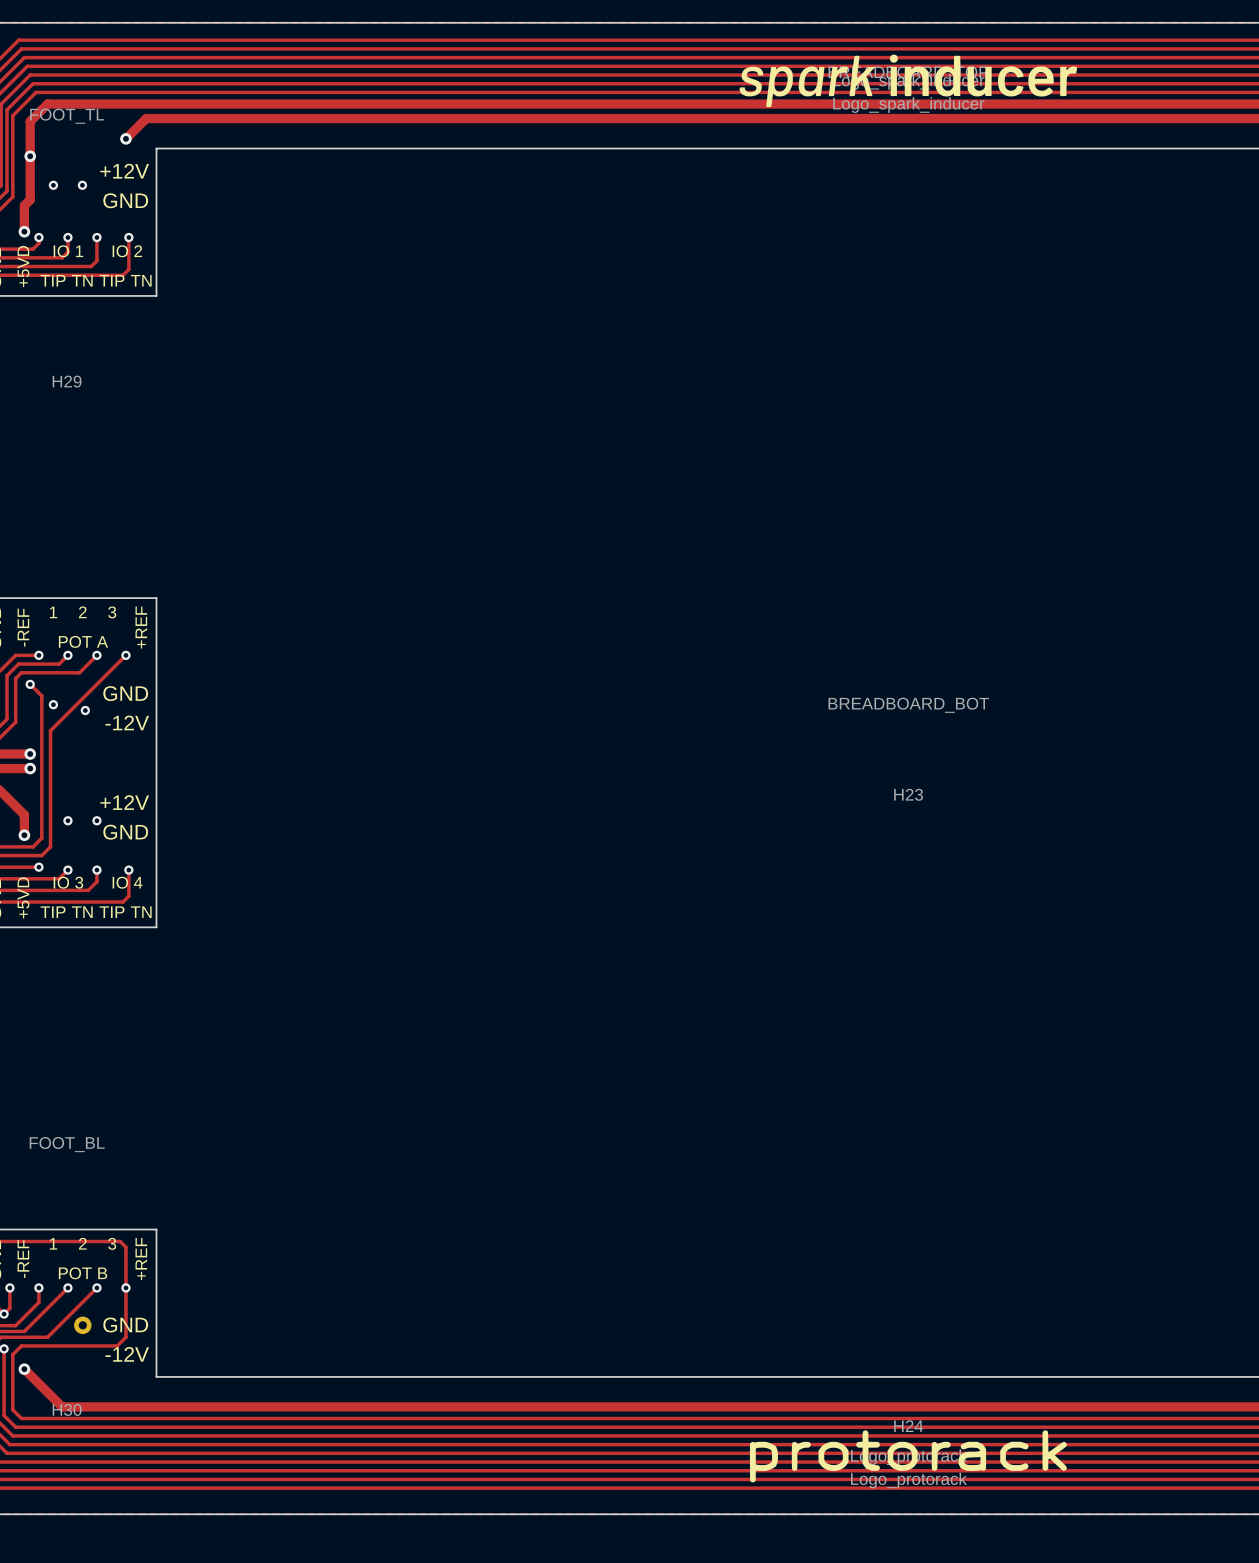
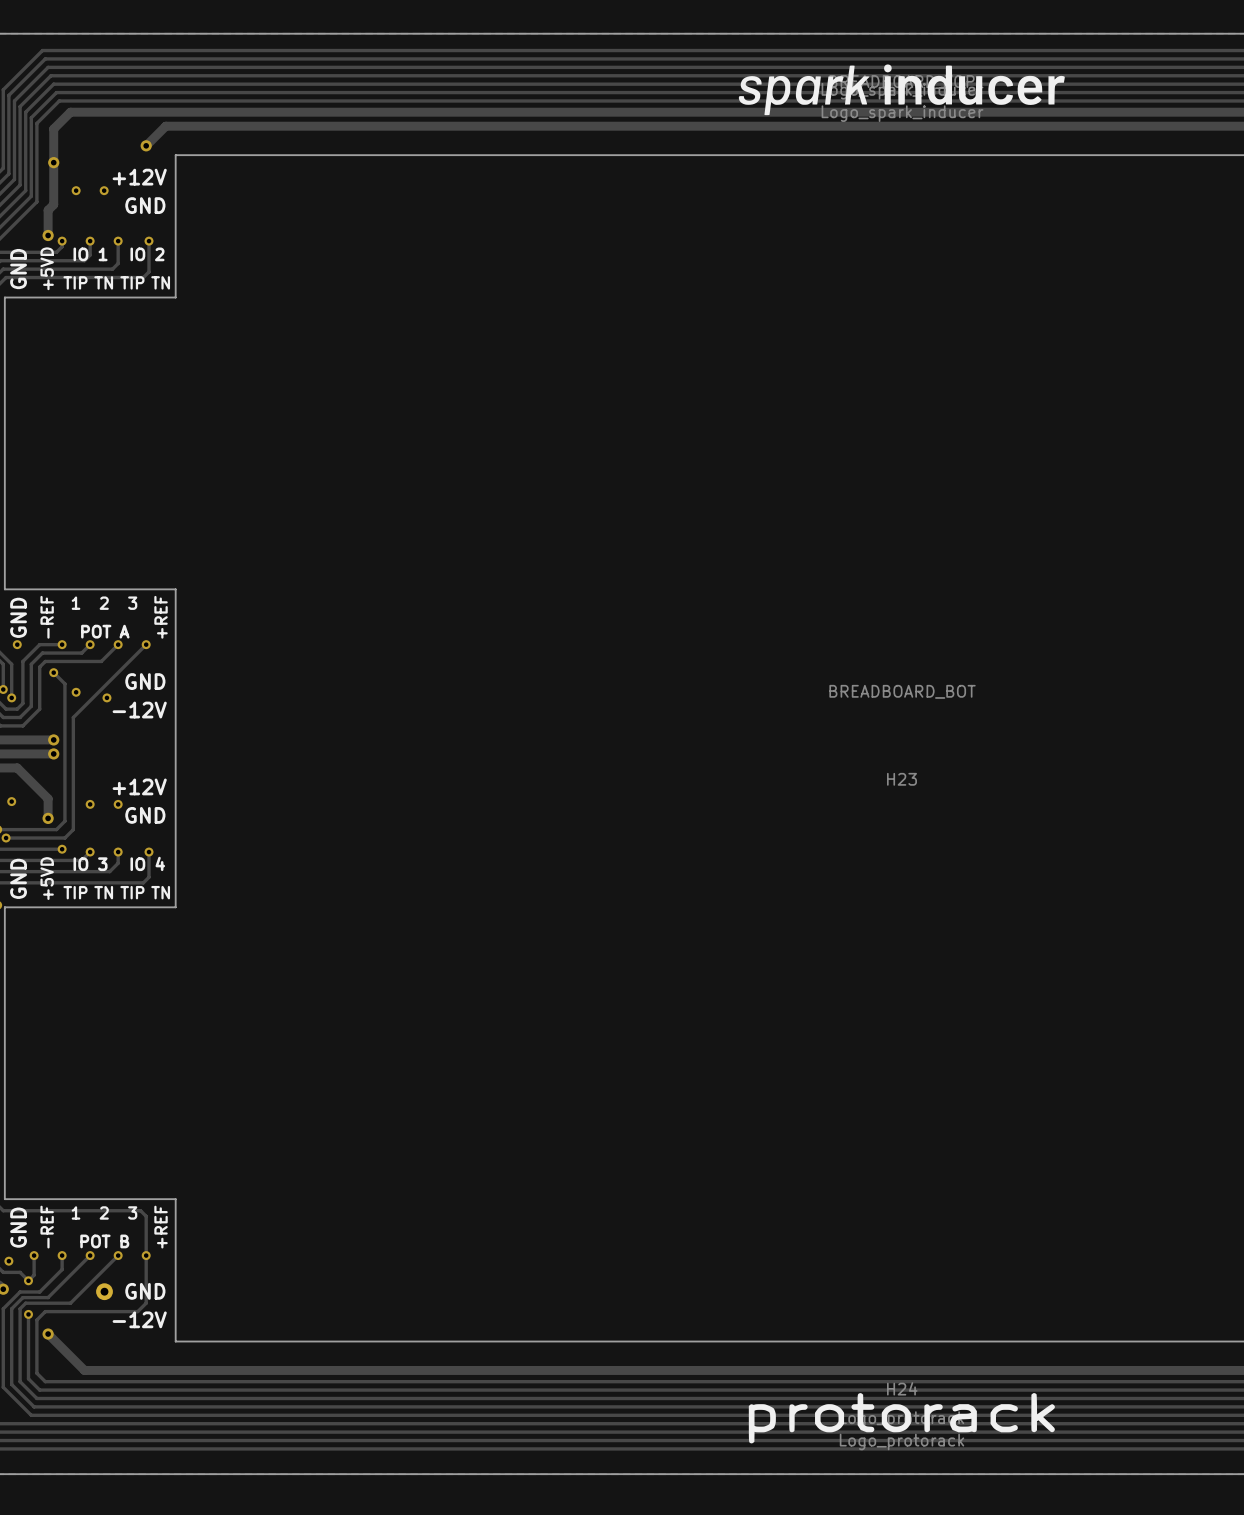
H29: FOOT_TL (67, 248) -> none
H30: FOOT_BL (67, 1276) -> none

